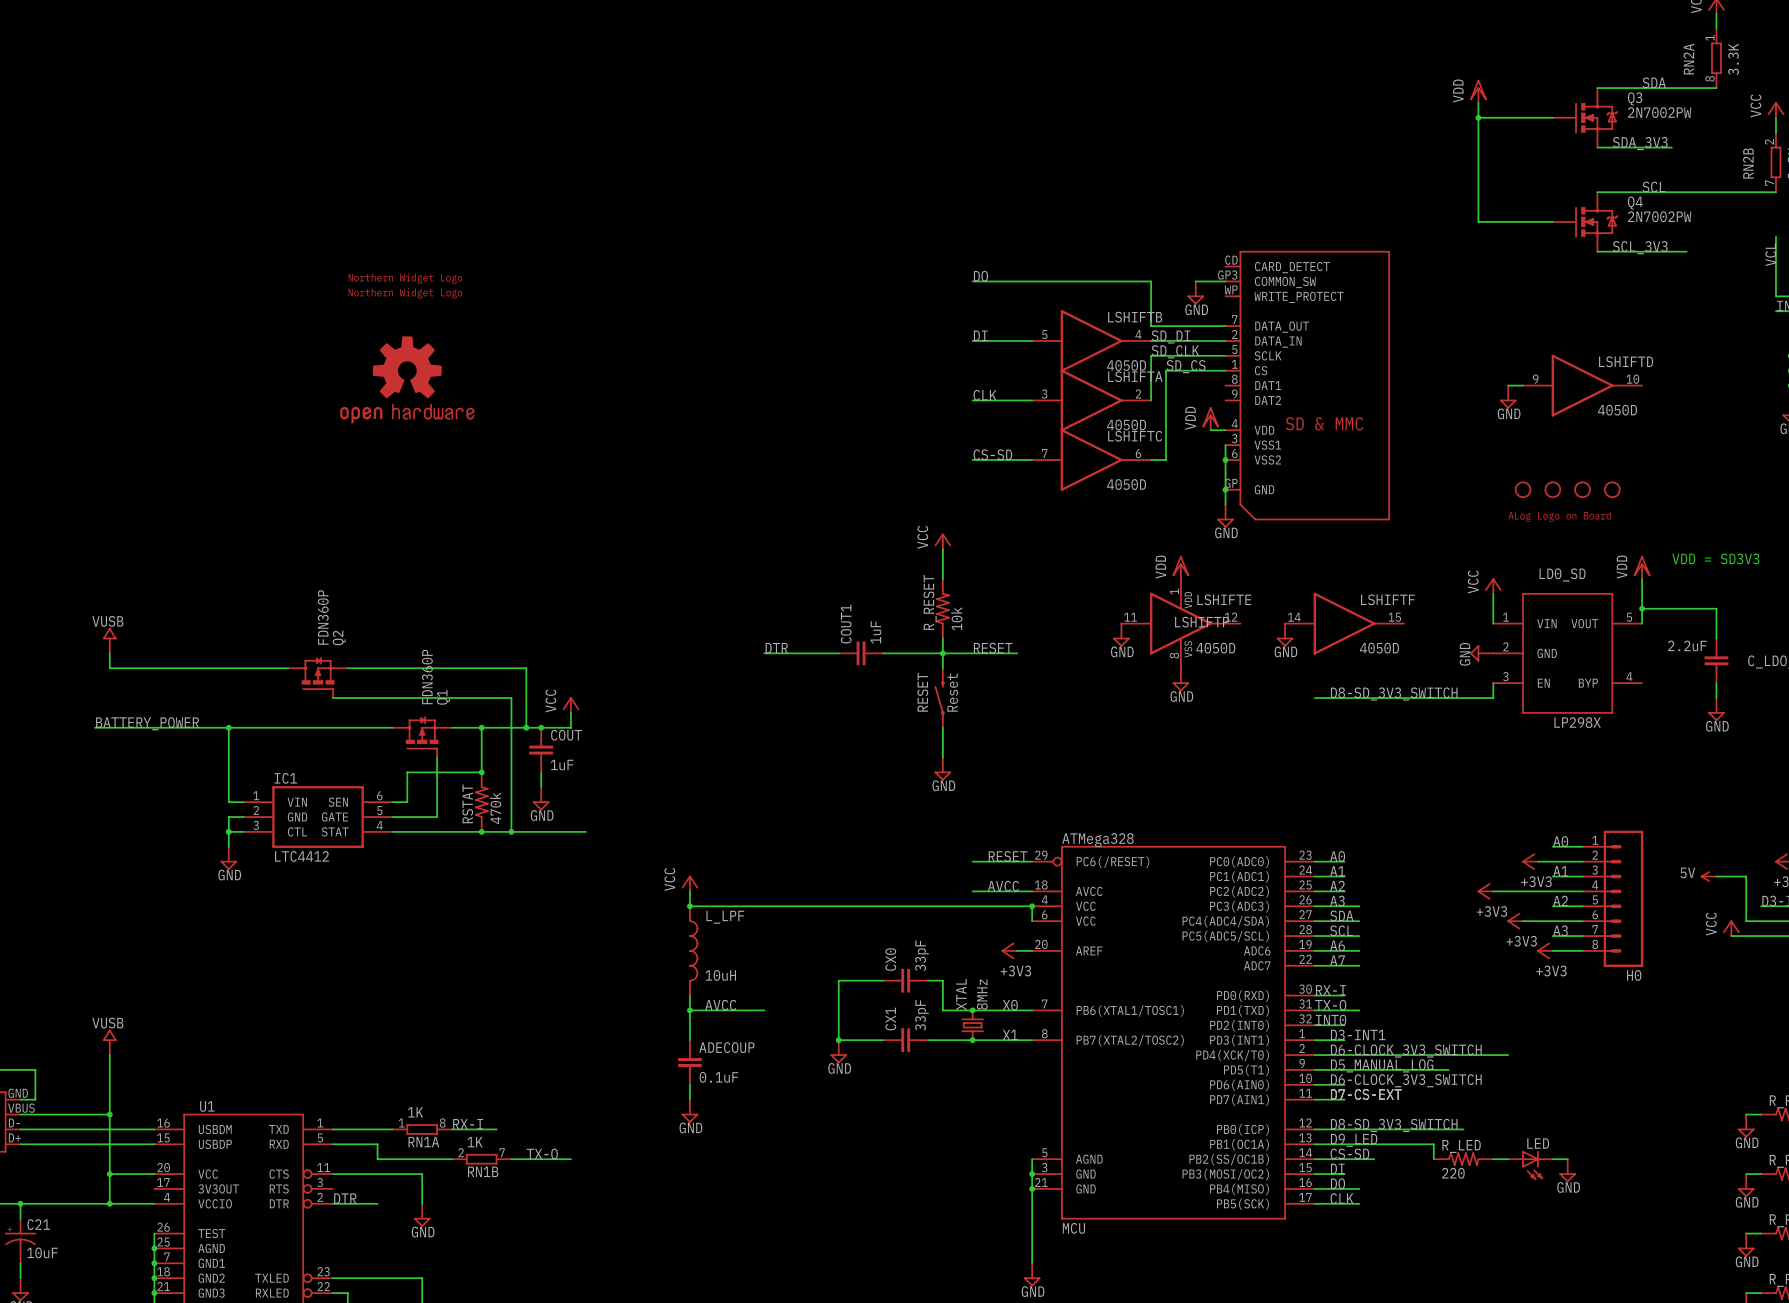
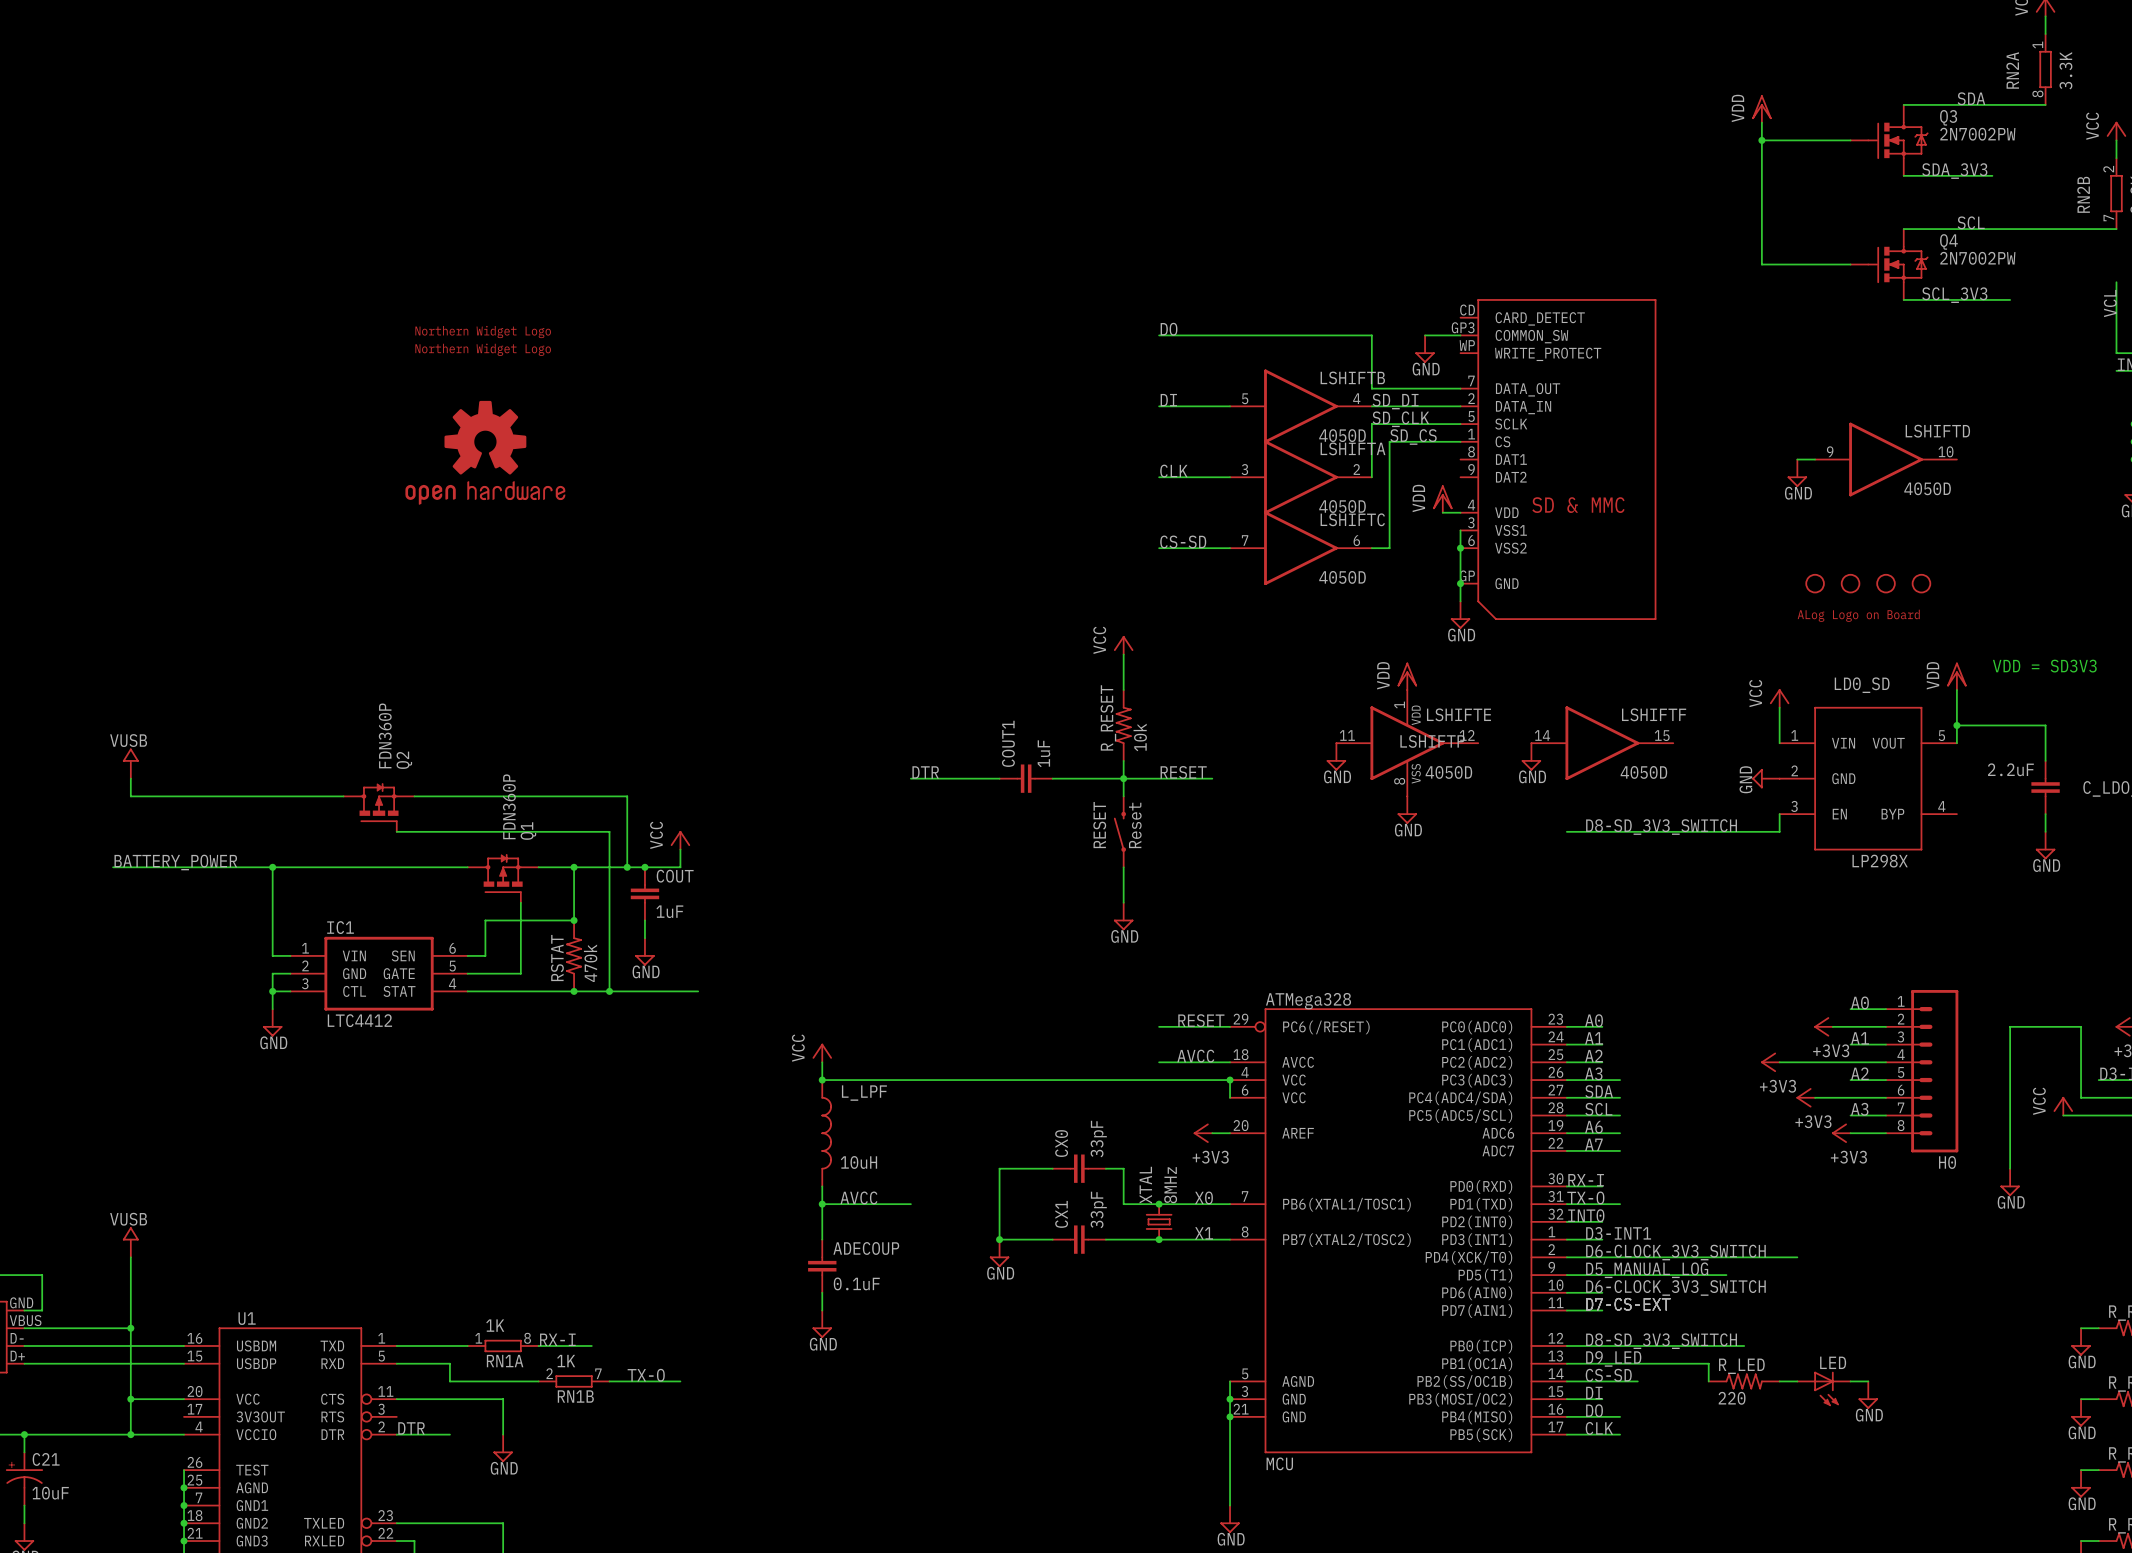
power symbol: 5V (1708, 876) -> none
wire: (1716, 876) (1746, 876) -> (2010, 1168) (2010, 1026) (2081, 1026) (2081, 1044)
power symbol: none -> GND (2010, 1182)

